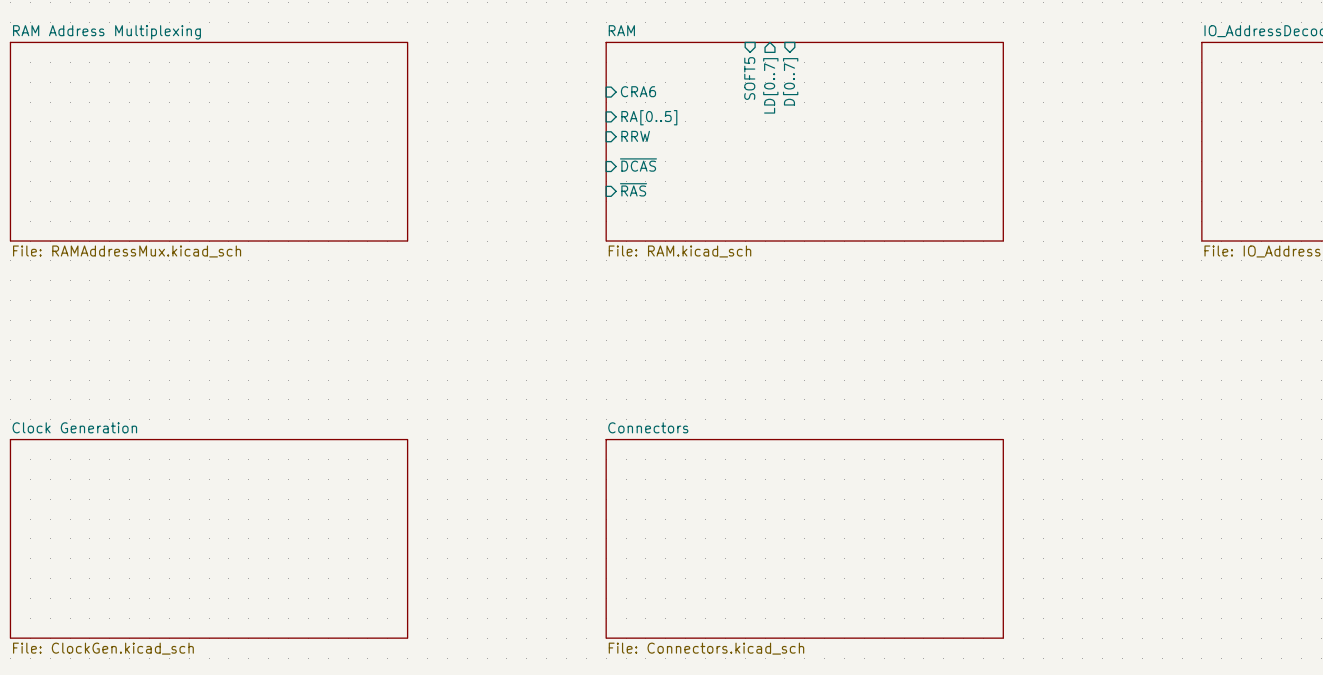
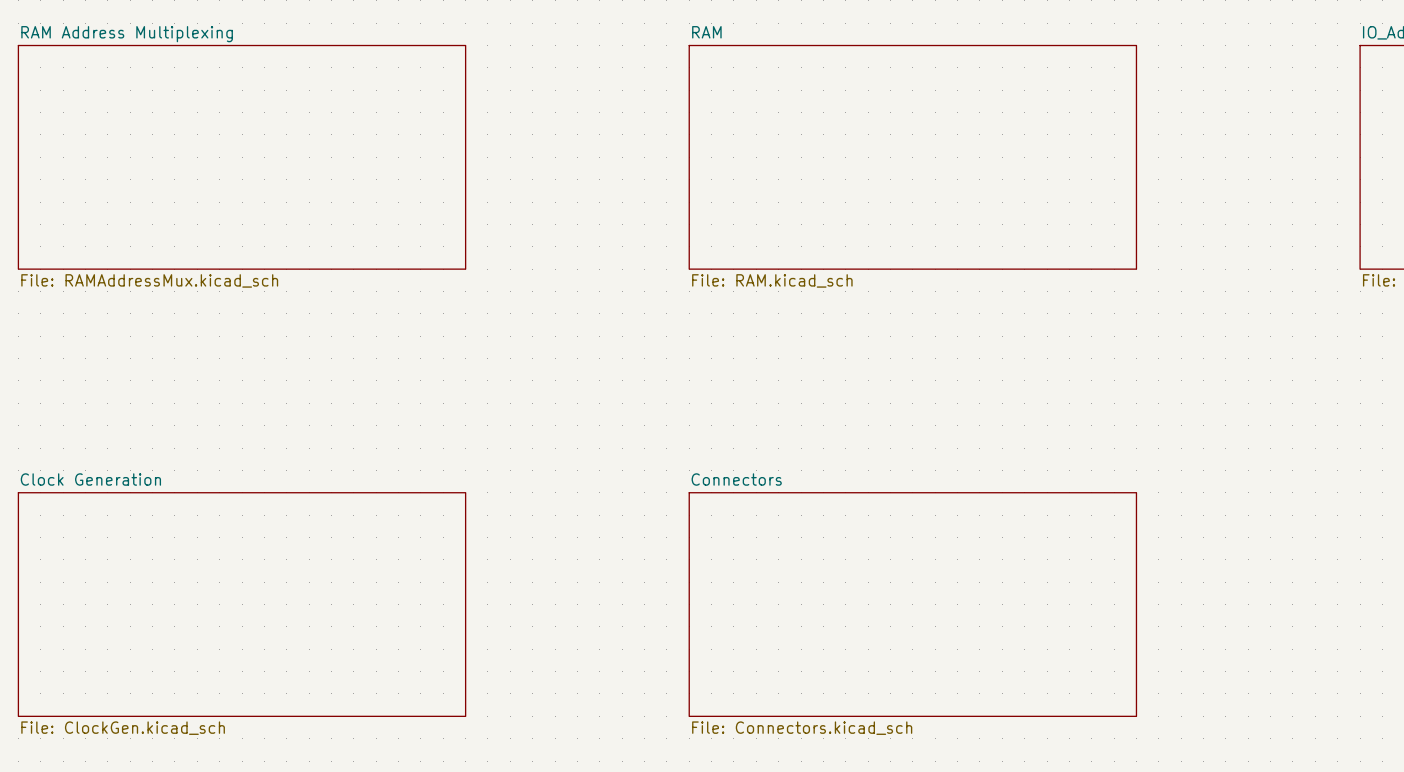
sheet pin: SOFT5 (749, 78) -> none
sheet pin: D[0..7] (790, 81) -> none
sheet pin: LD[0..7] (770, 85) -> none
sheet pin: CRA6 (638, 91) -> none
sheet pin: RA[0..5] (649, 117) -> none
sheet pin: RRW (635, 136) -> none
sheet pin: ~{DCAS} (638, 165) -> none
sheet pin: ~{RAS} (633, 189) -> none

